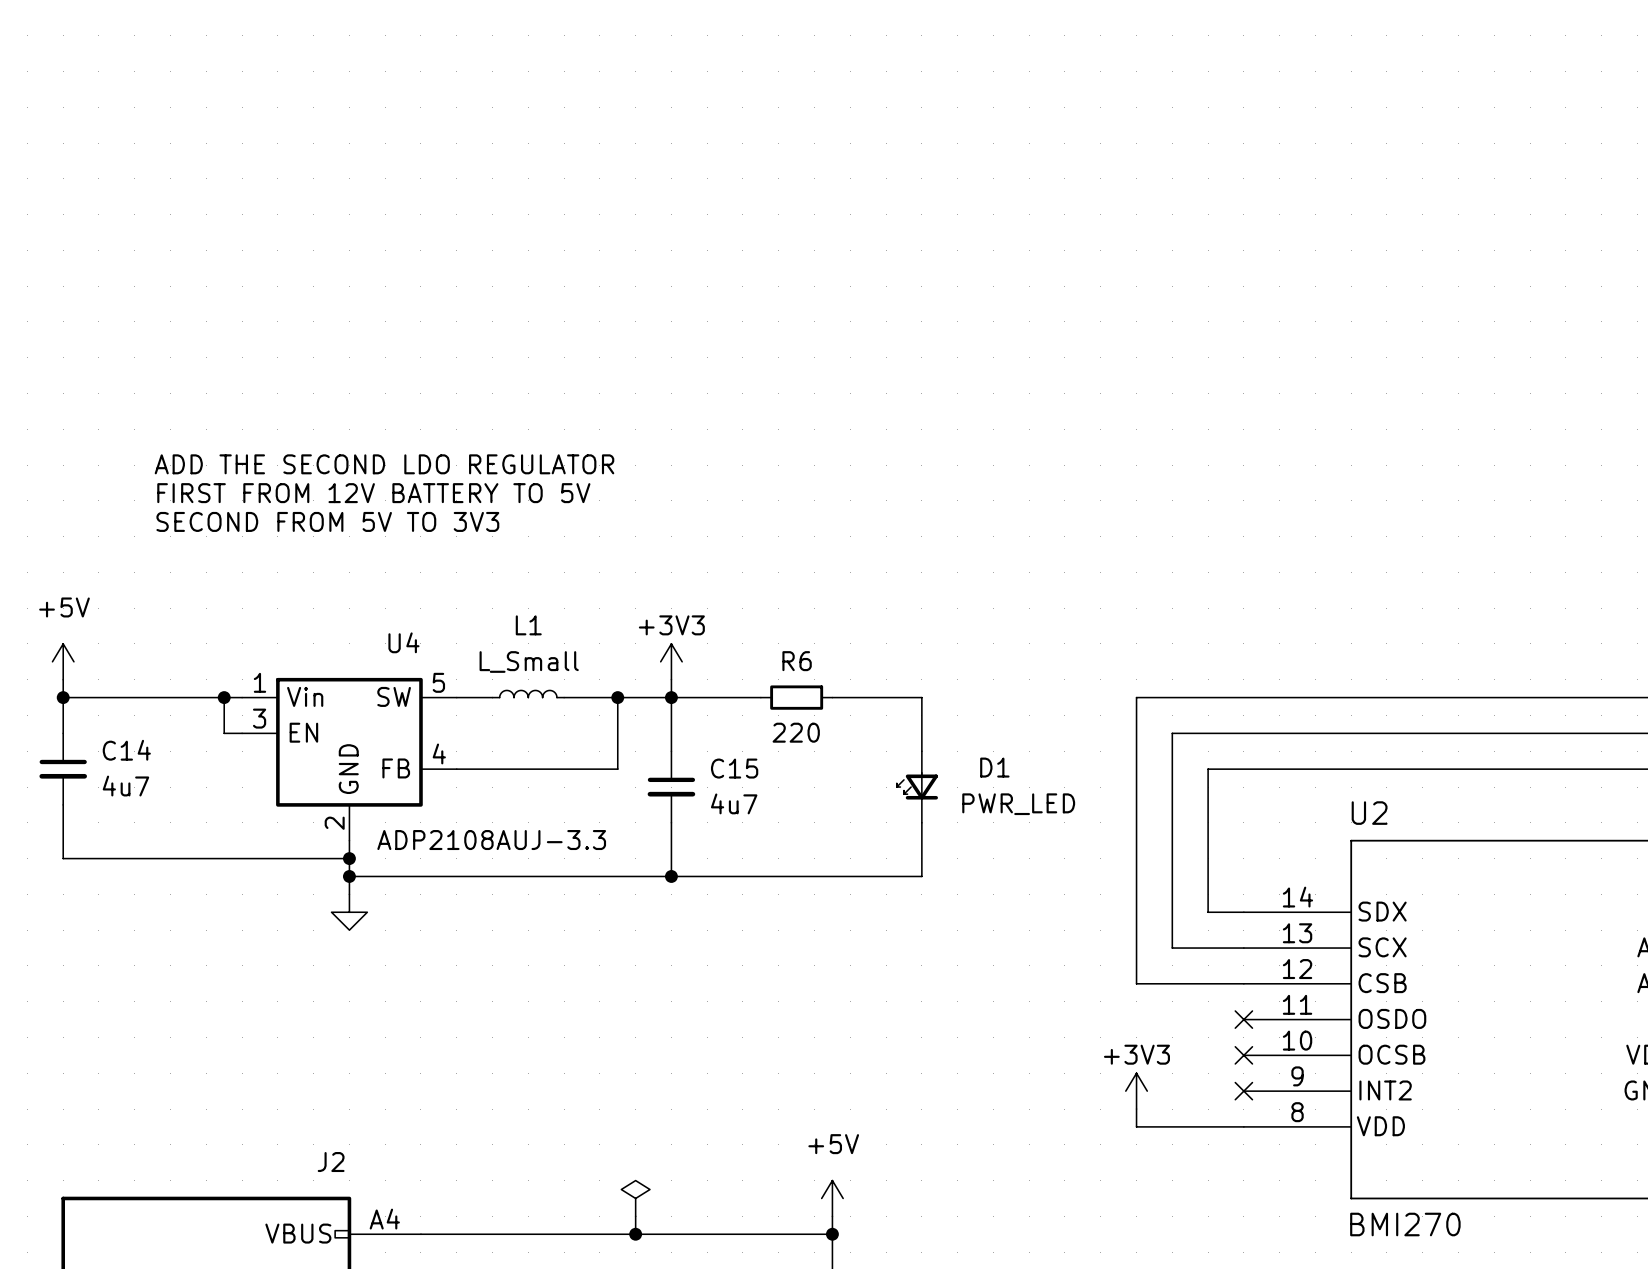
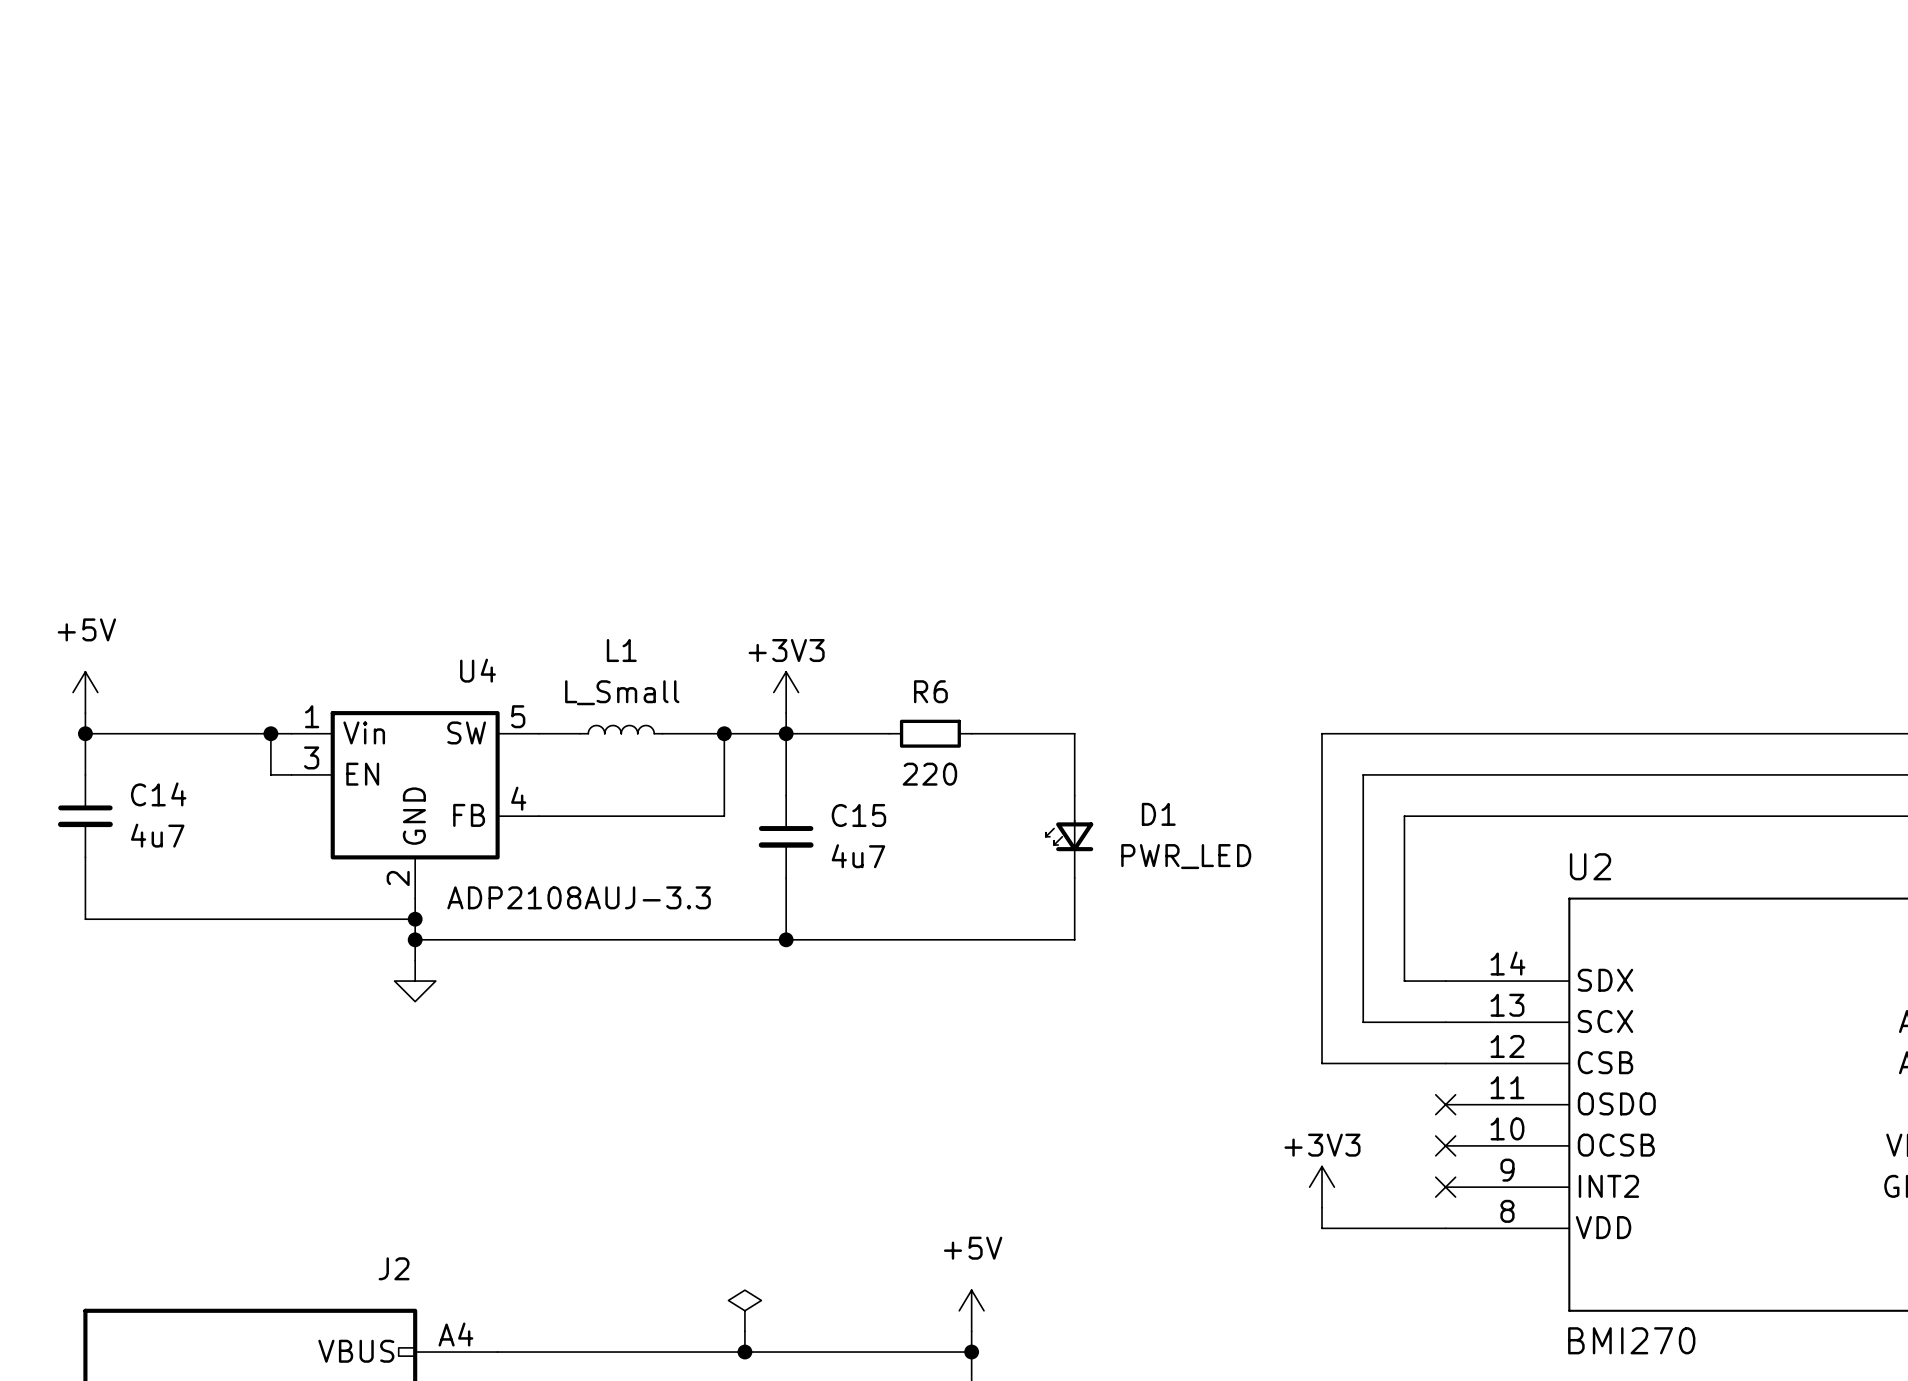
text: ADD THE SECOND LDO REGULATOR (384, 464) -> none
text: FIRST FROM 12V BATTERY TO 5V (373, 493) -> none
text: SECOND FROM 5V TO 3V3 (327, 521) -> none

